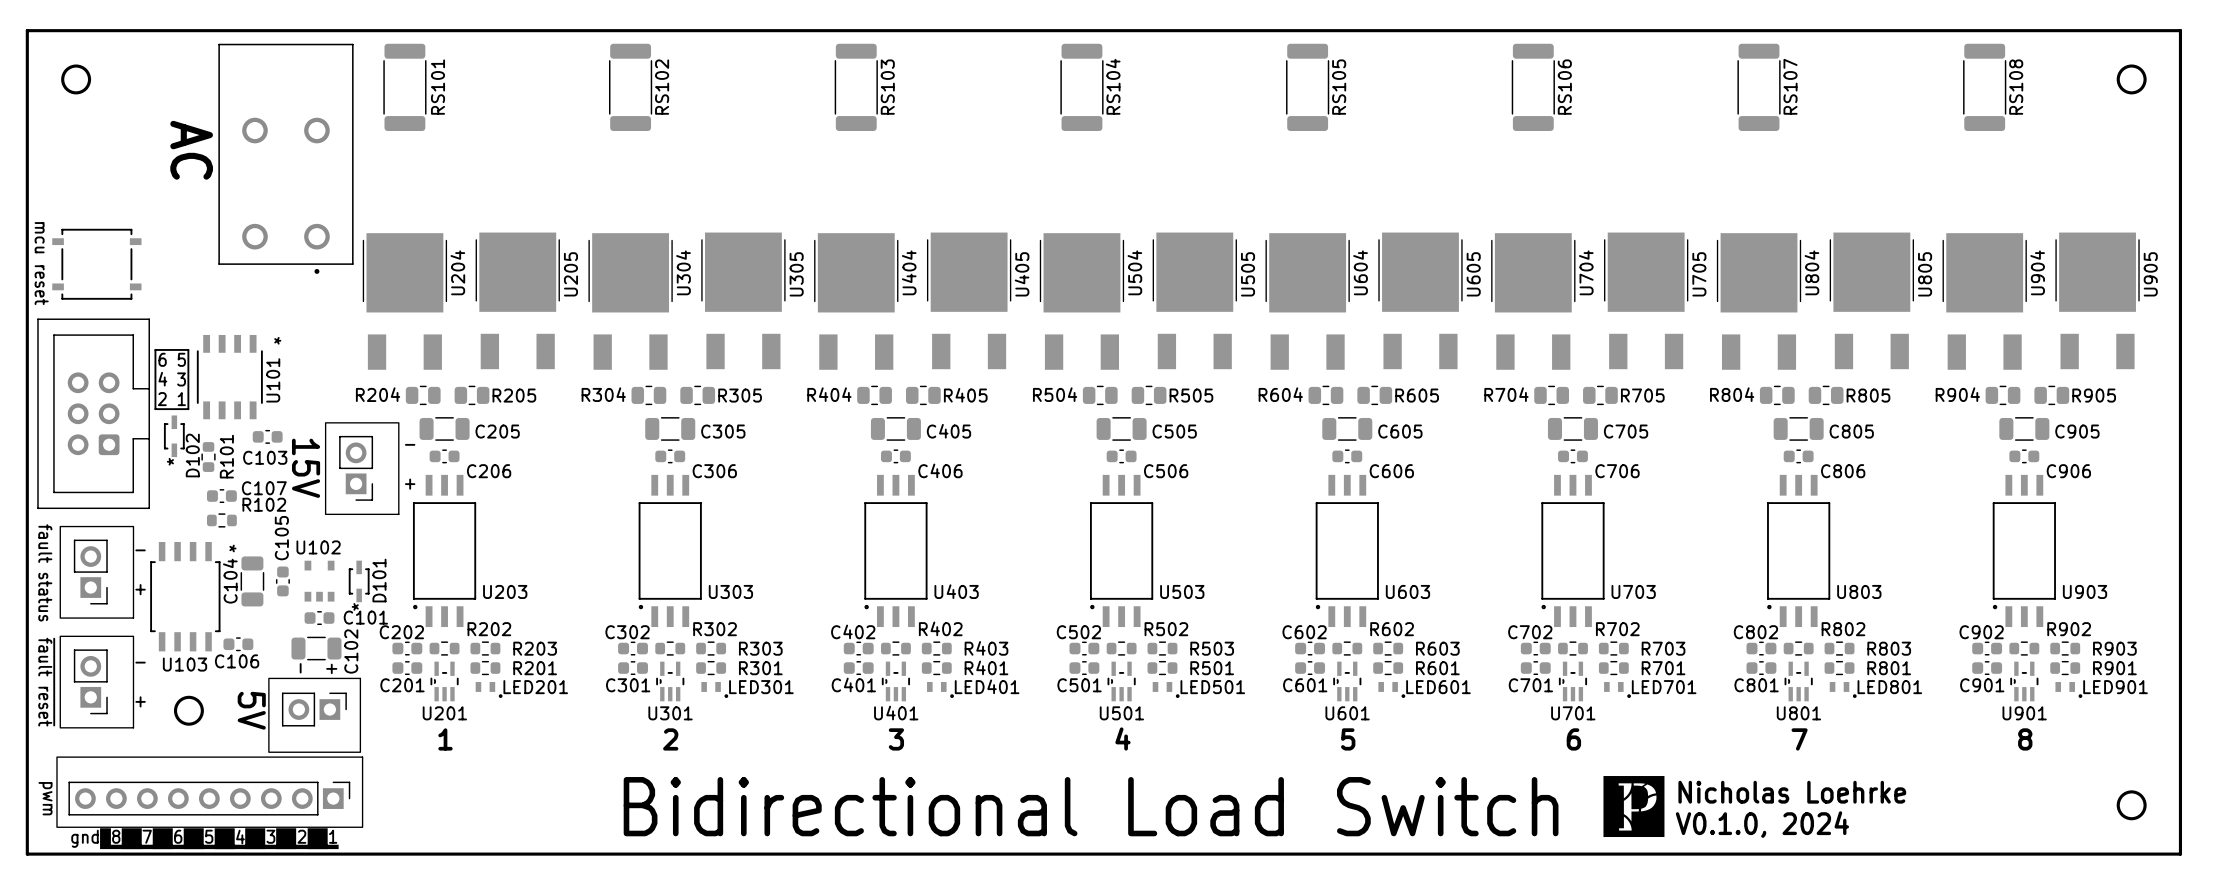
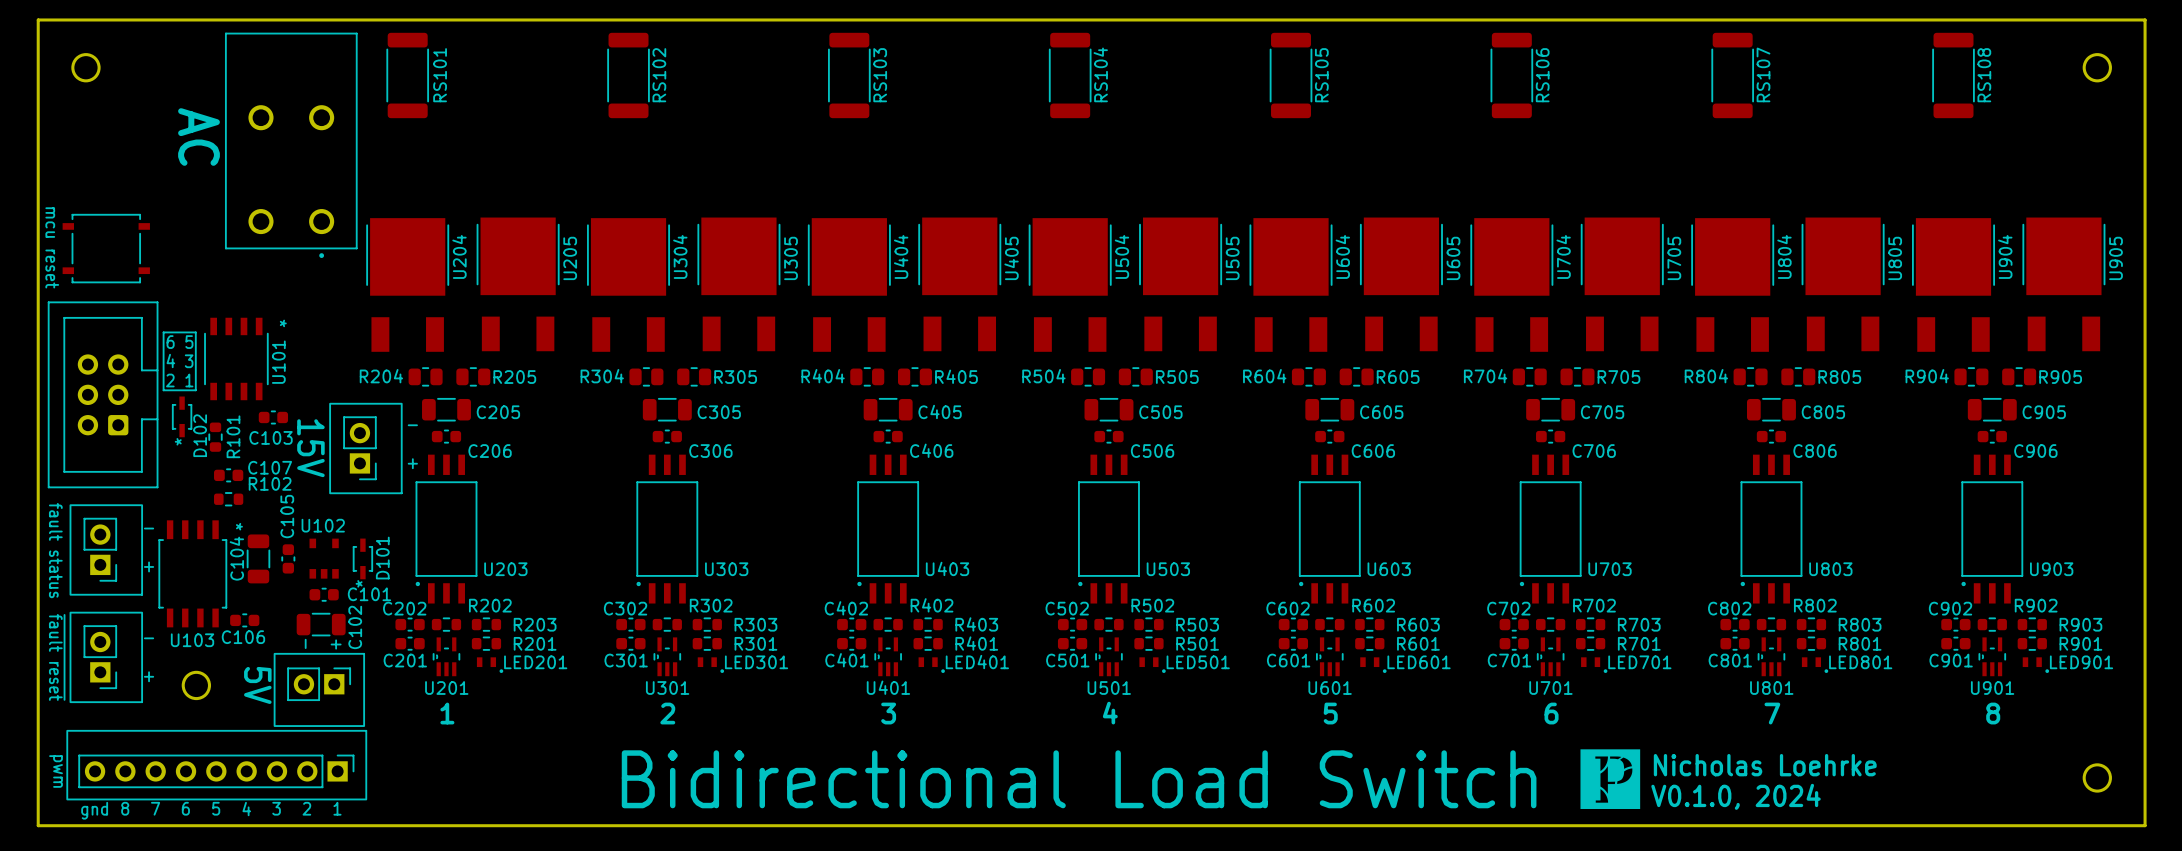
drawing: [100, 828, 339, 850] -> none

